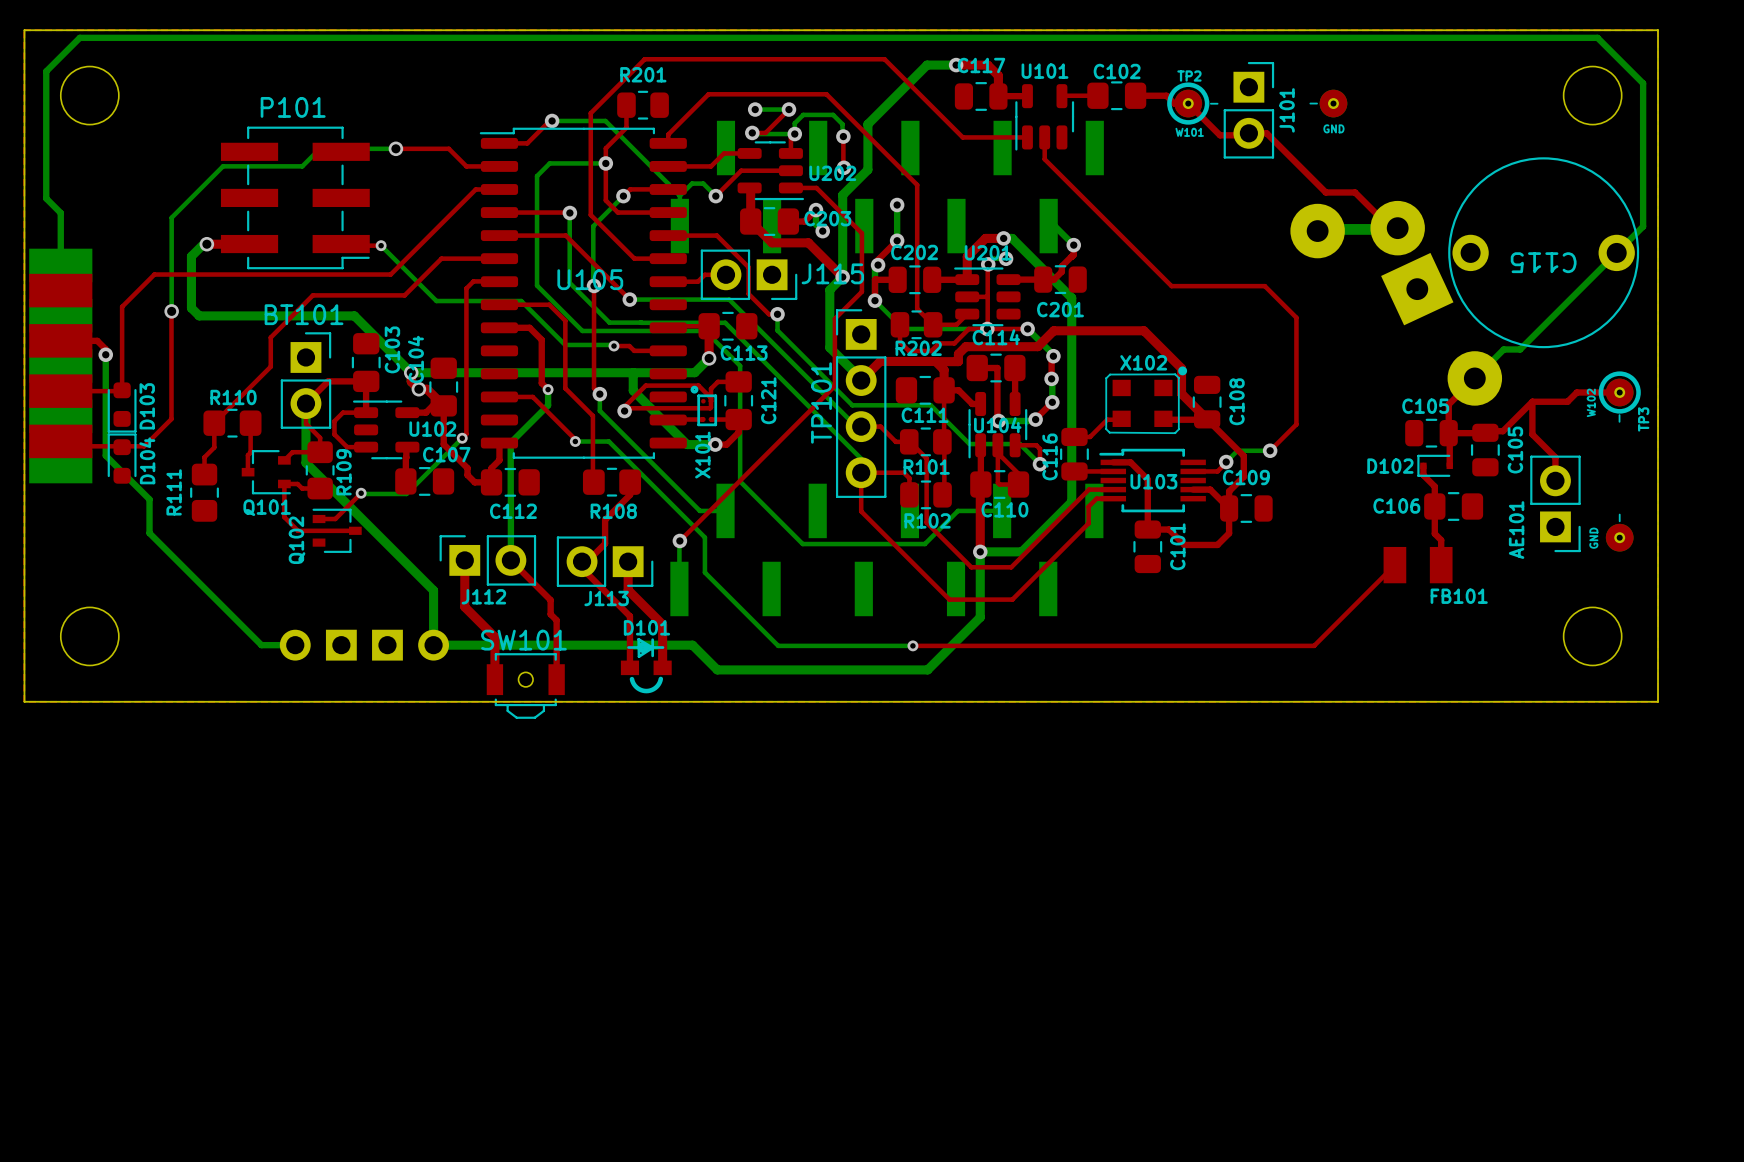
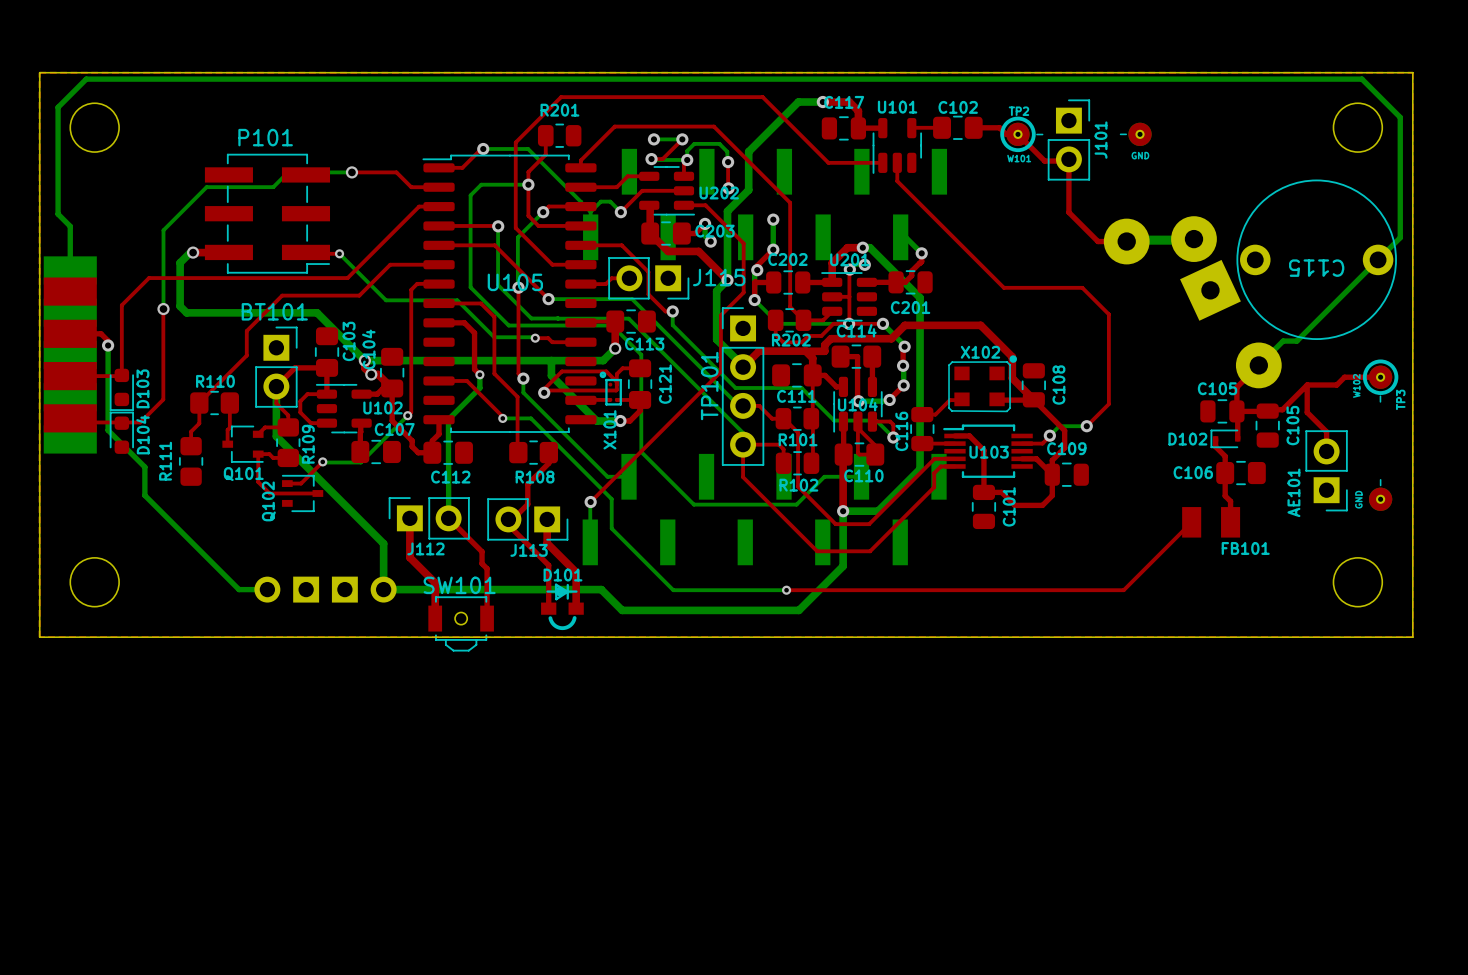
top track: (1248, 133) (1266, 133) (1325, 192) (1355, 192) (1390, 228) (1397, 228) -> (1068, 159) (1068, 212) (1097, 241) (1126, 241)

